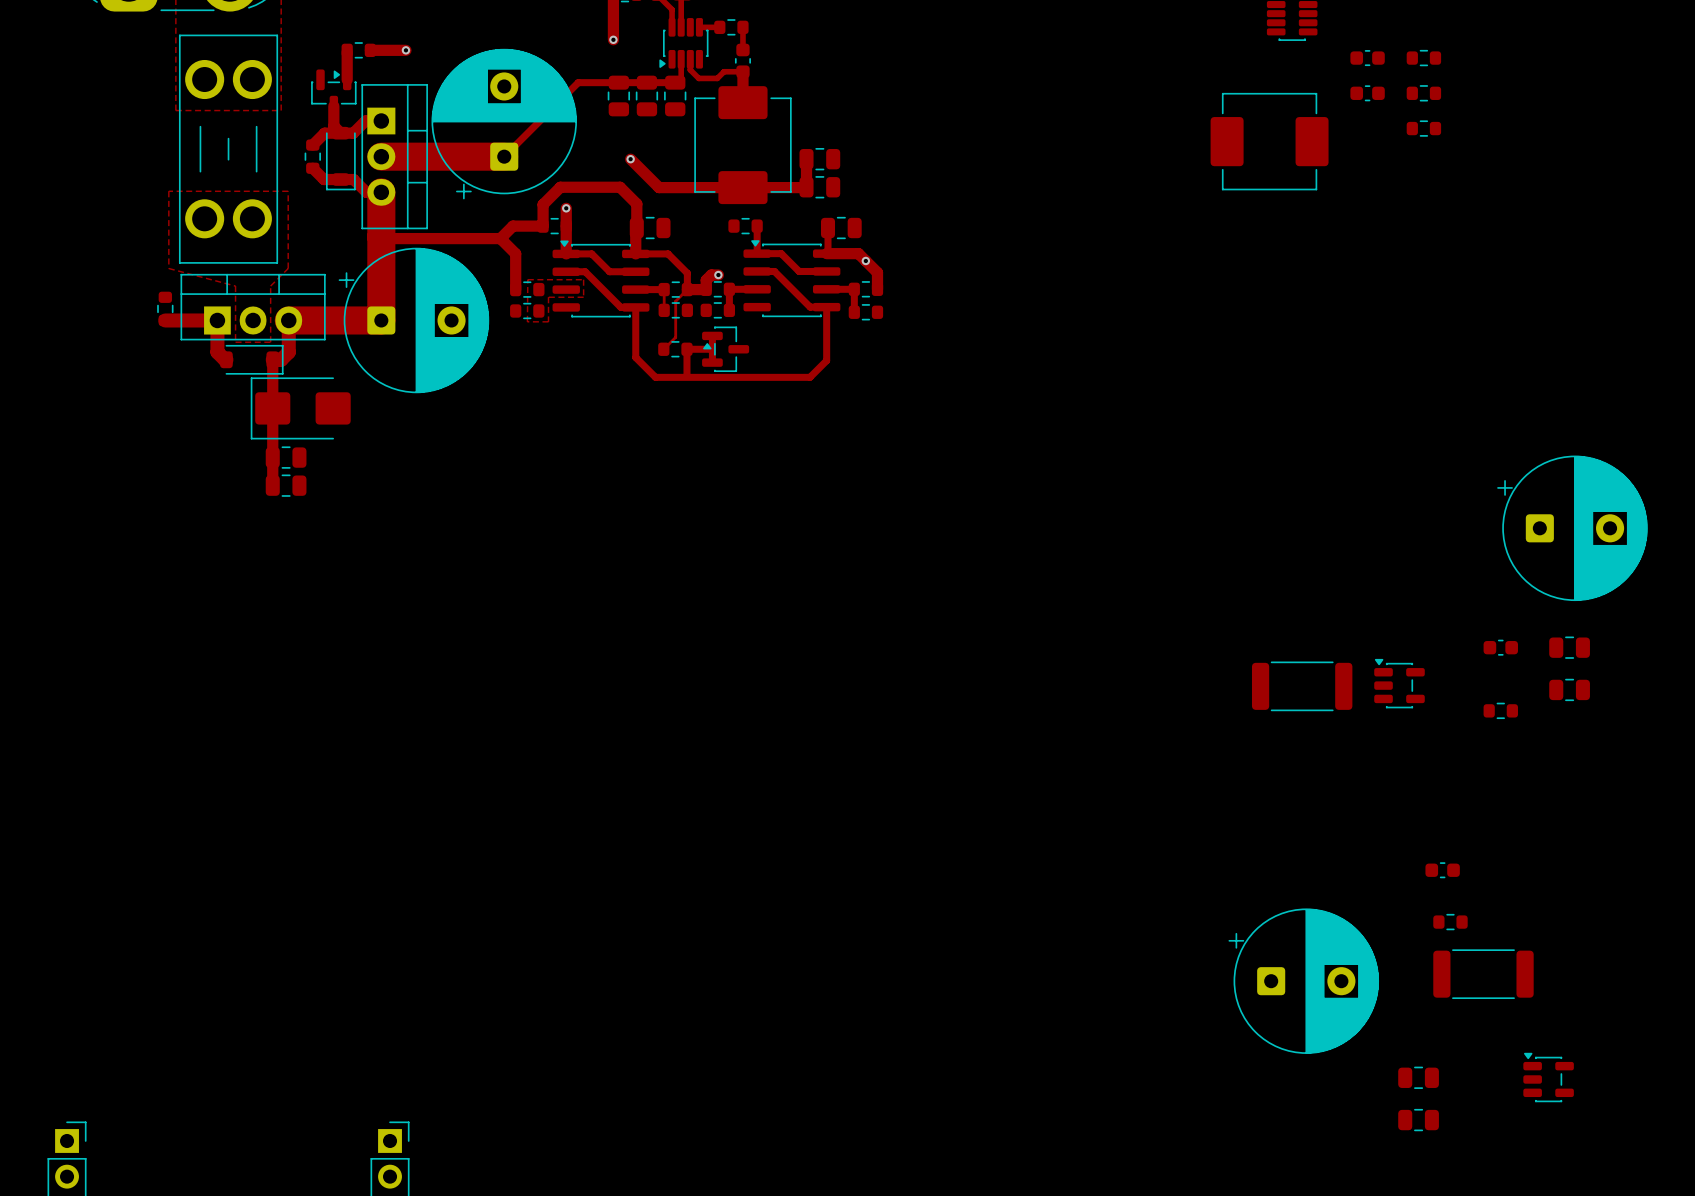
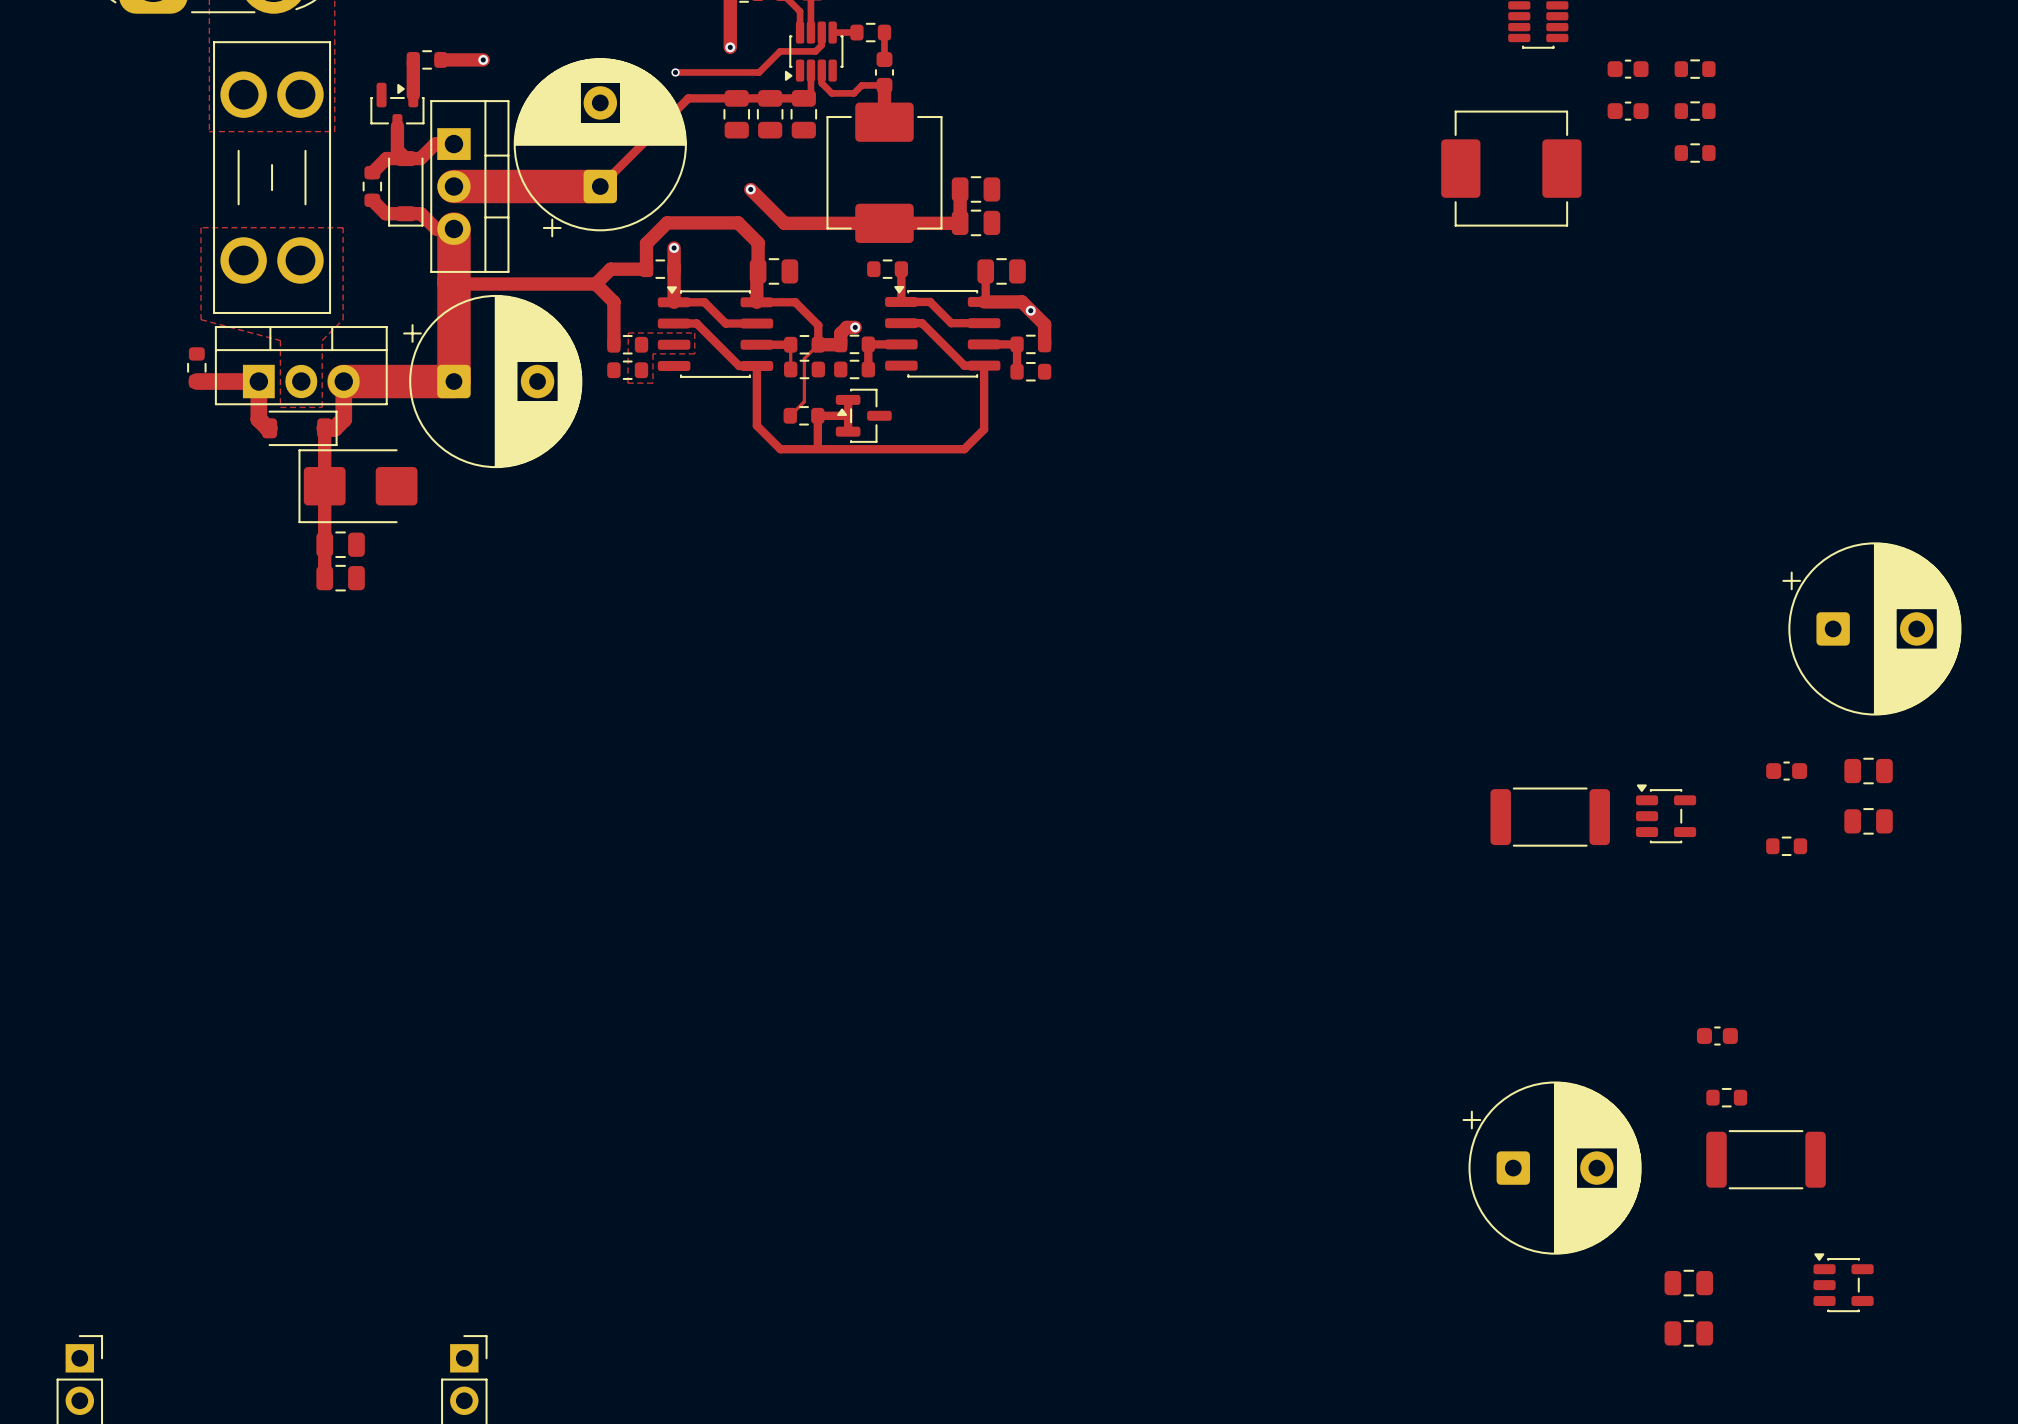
track: none -> (821, 32) (821, 45) (815, 51) (780, 51) (759, 72) (675, 72)
via: none -> (675, 72)

